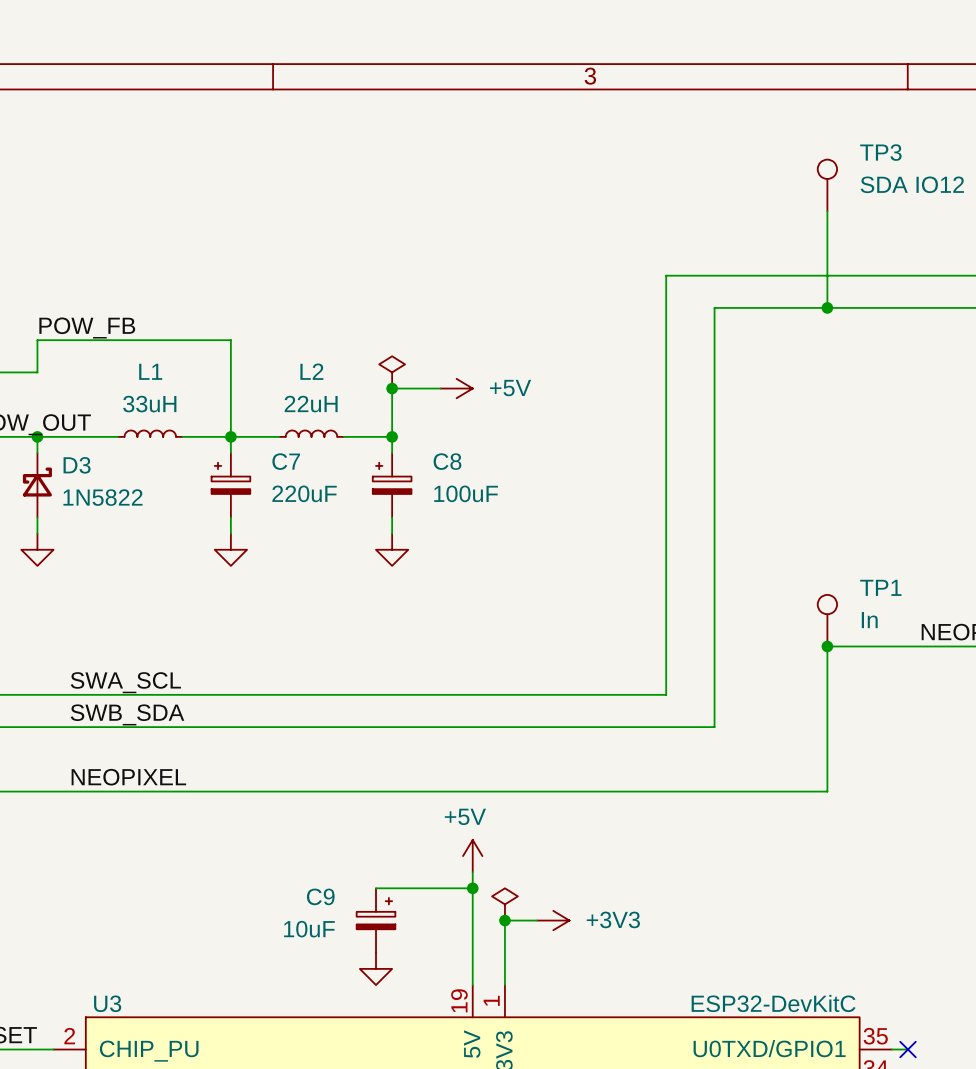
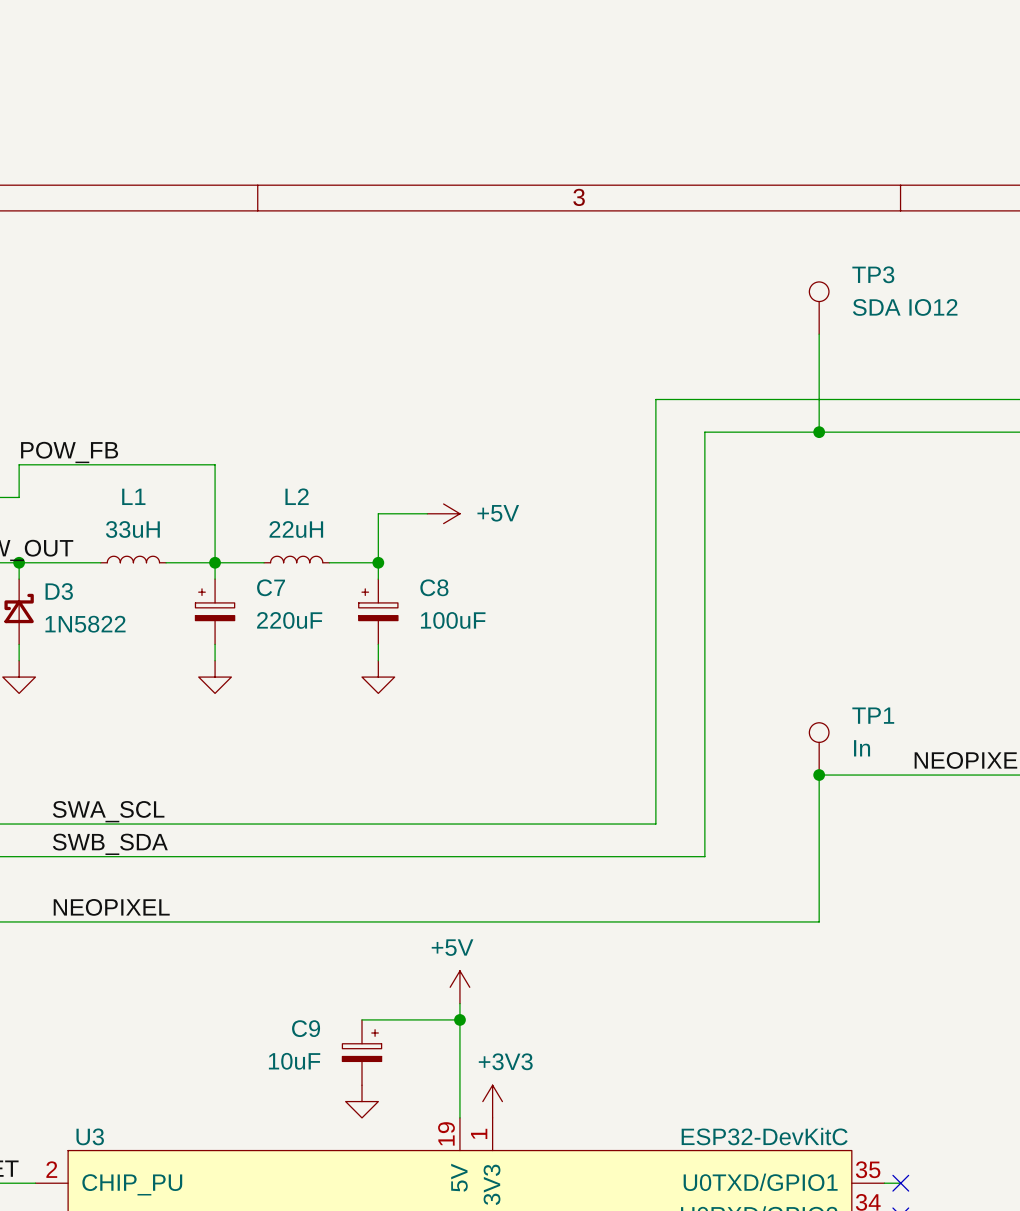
power symbol: (392, 372) -> none
junction: (392, 388) -> none
power symbol: (504, 904) -> none
power symbol text position: +3V3 (613, 919) -> +3V3 (505, 1061)
junction: (504, 920) -> none
wire: (537, 920) (504, 920) (504, 985) -> none
power symbol rotation: 0° (553, 920) -> 90° counterclockwise (492, 1101)
power symbol position: +3V3 (553, 920) -> +3V3 (492, 1101)

